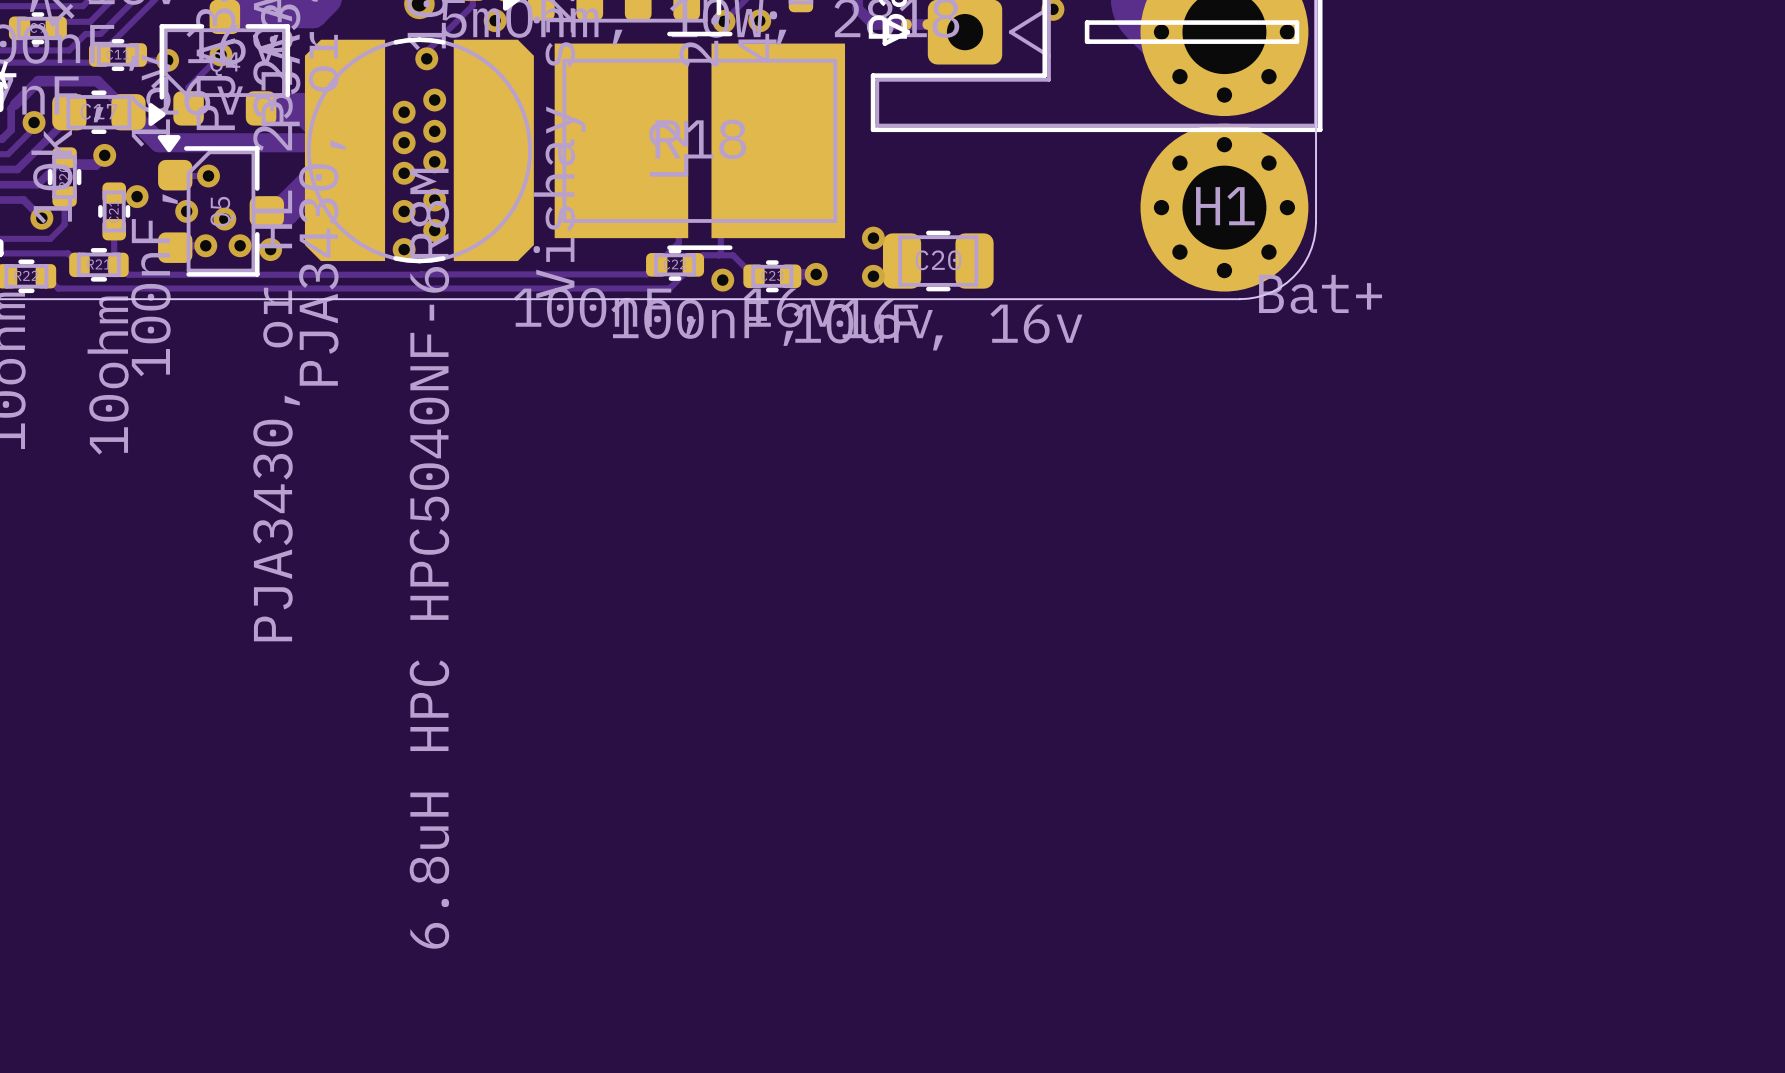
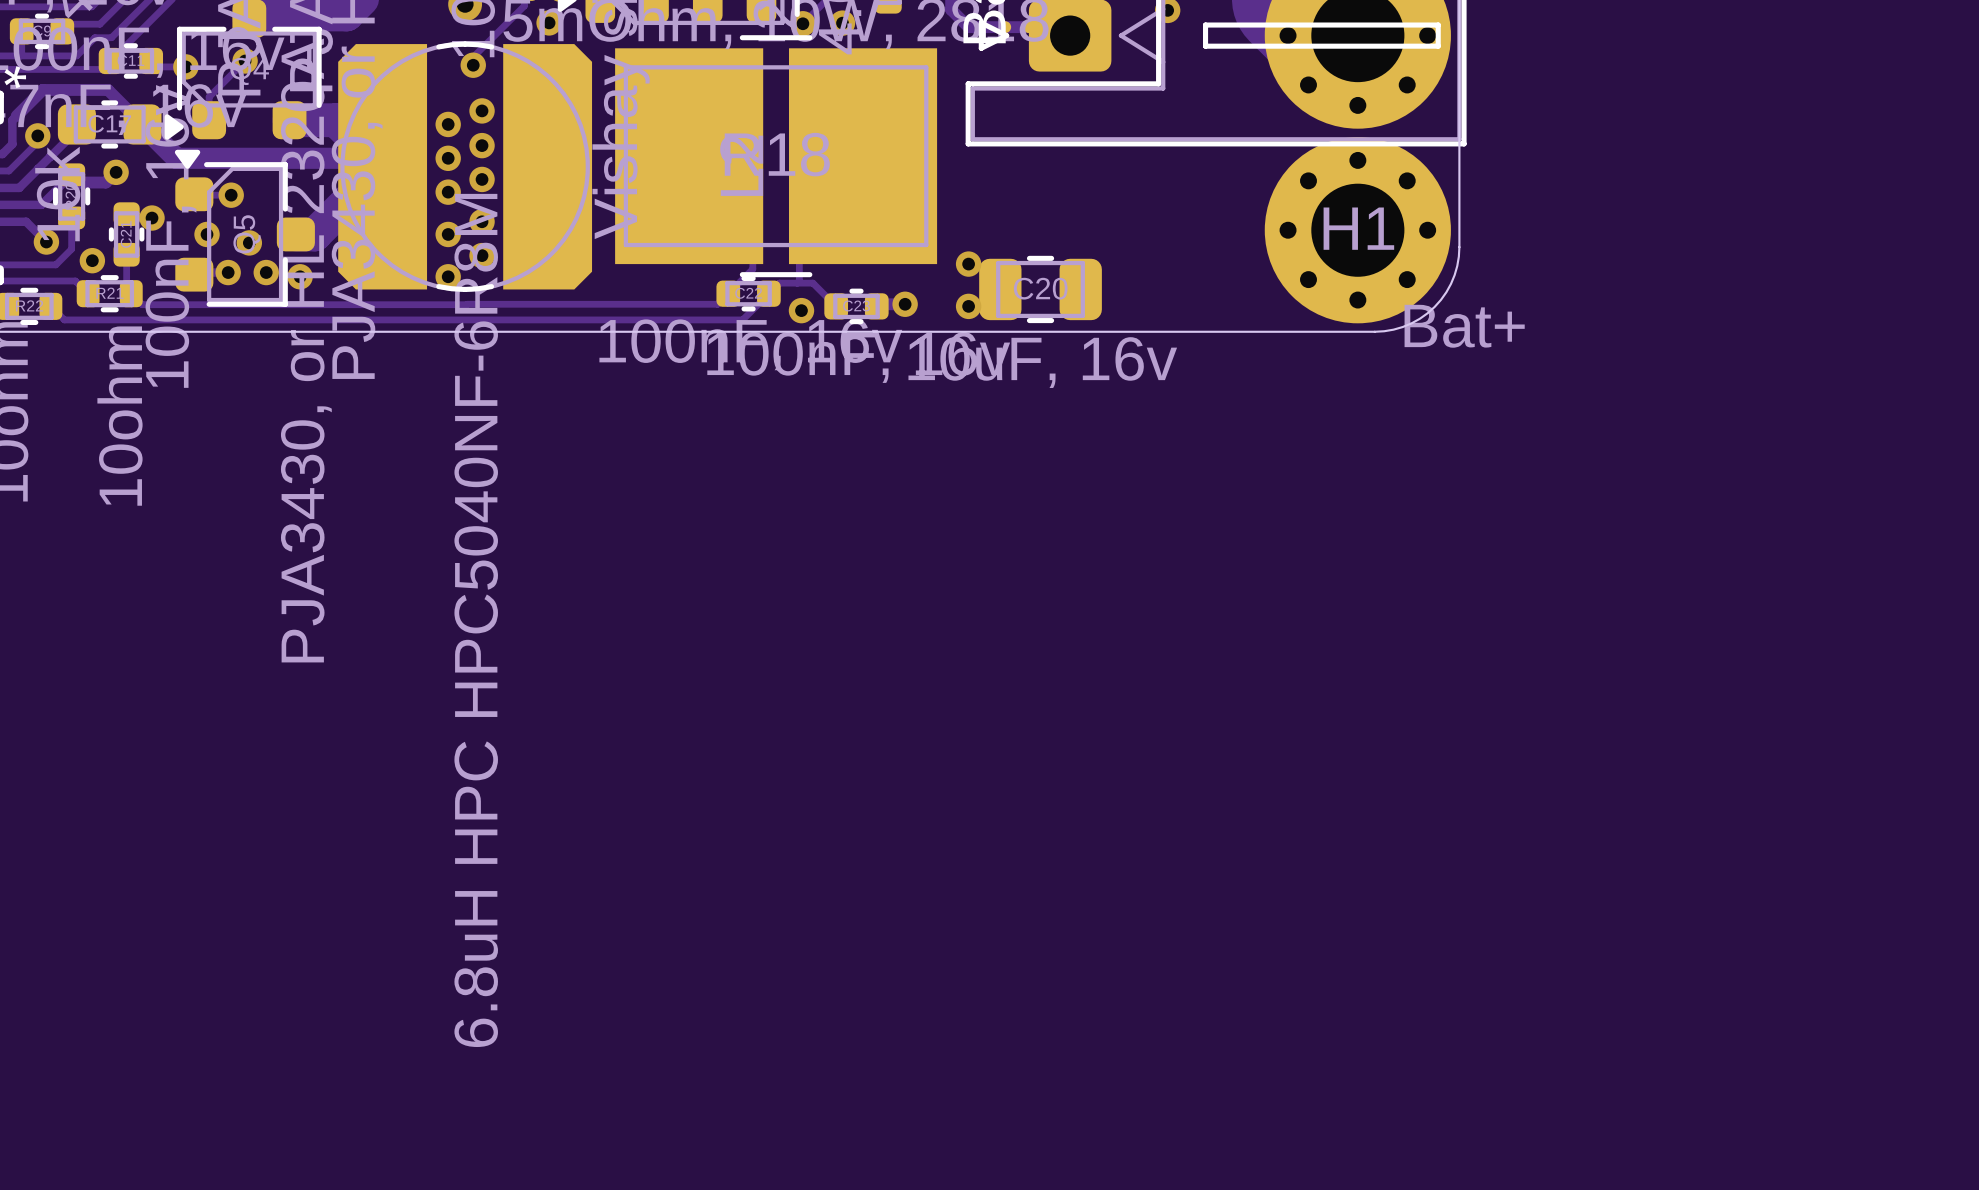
via: none -> (92, 260)

